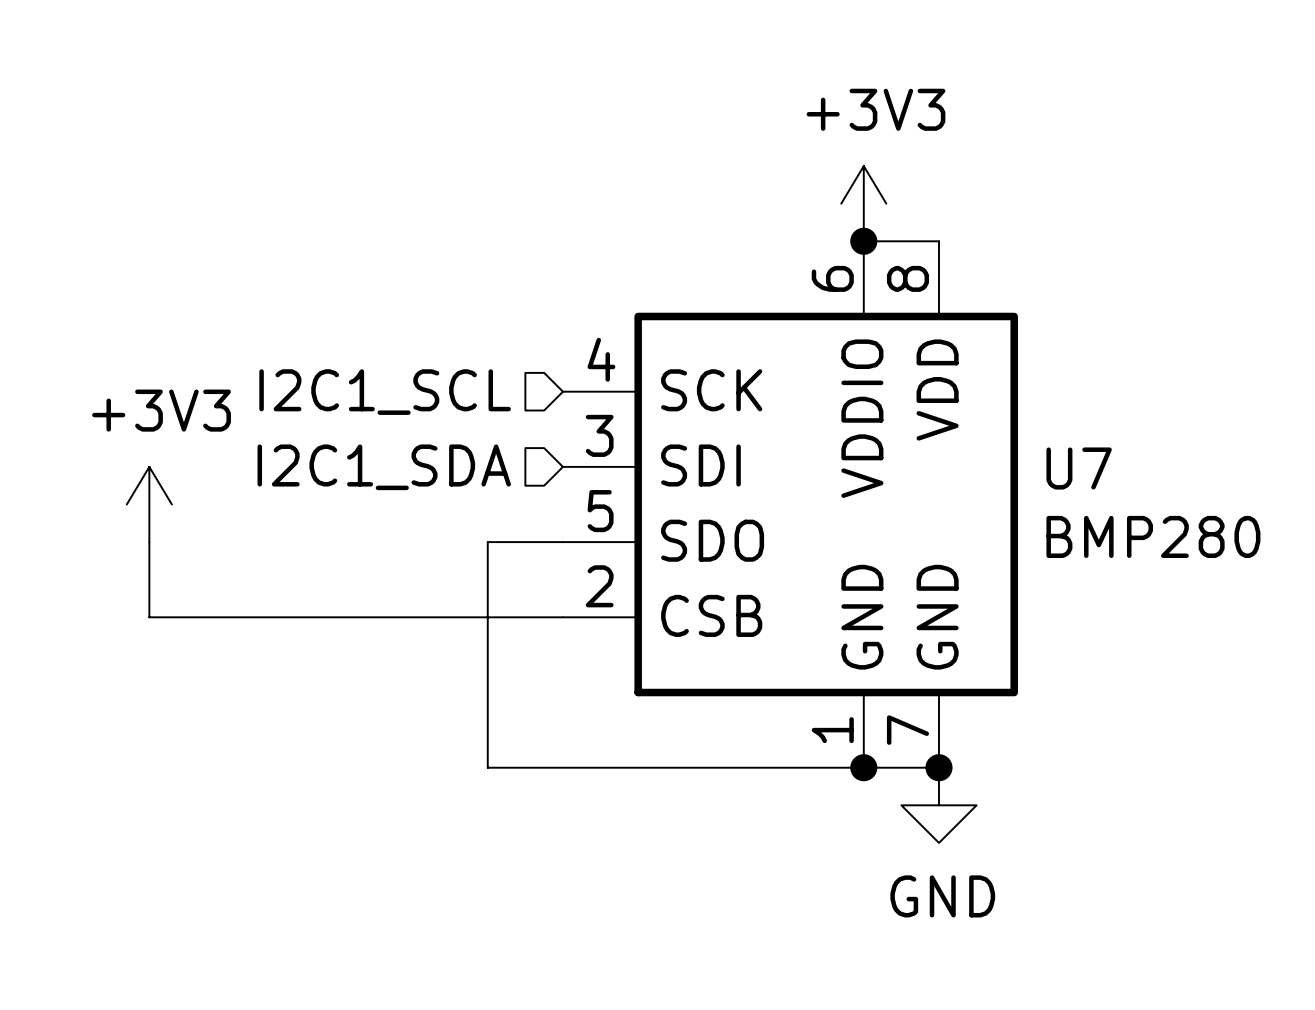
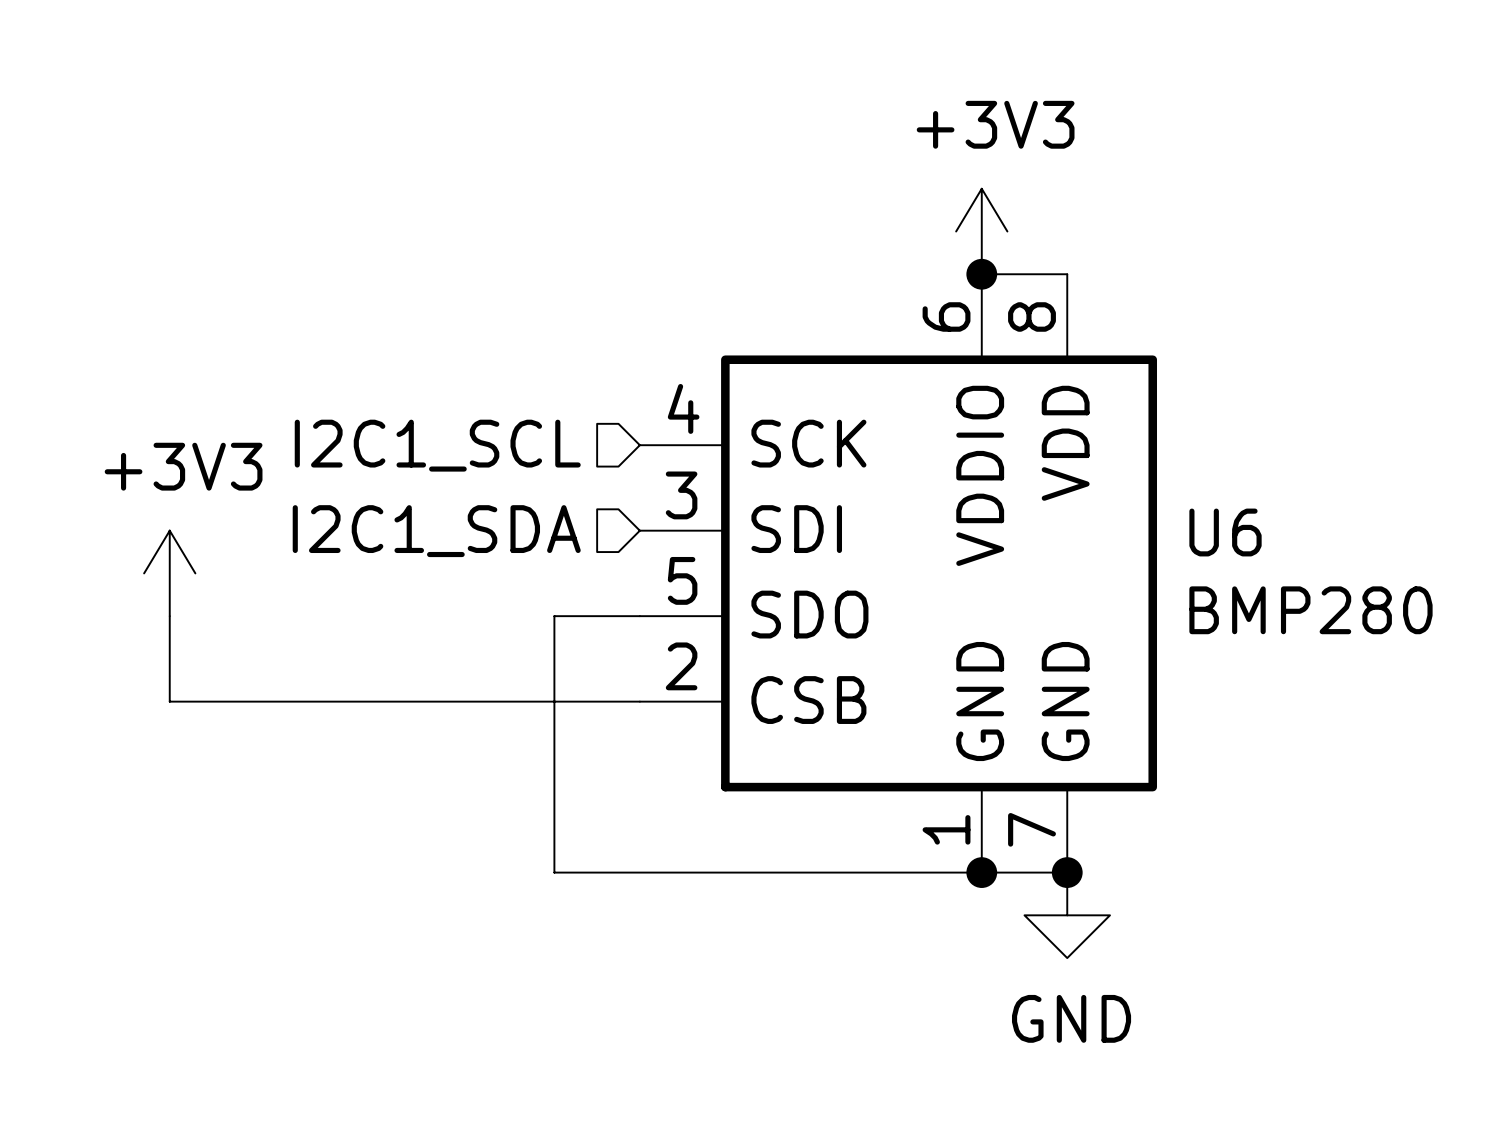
U7 name: U7 (1079, 468) -> U6 (1225, 532)

